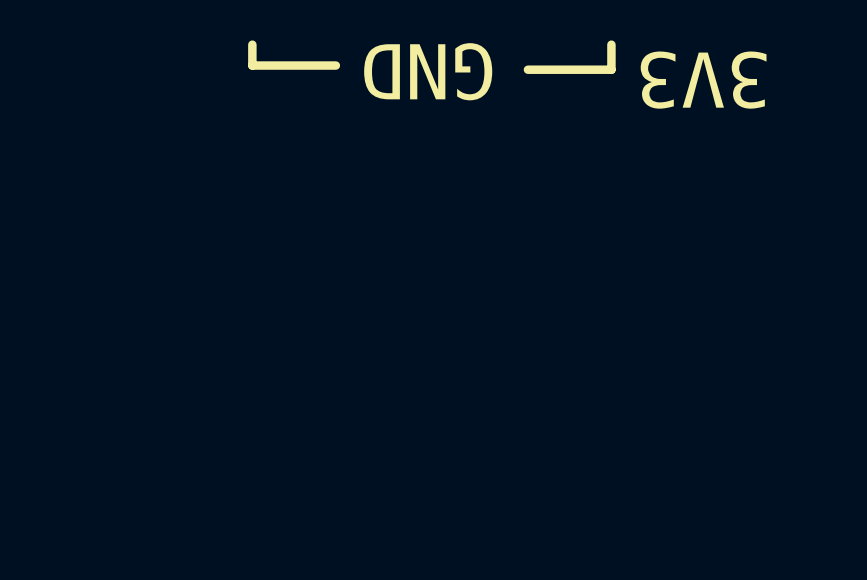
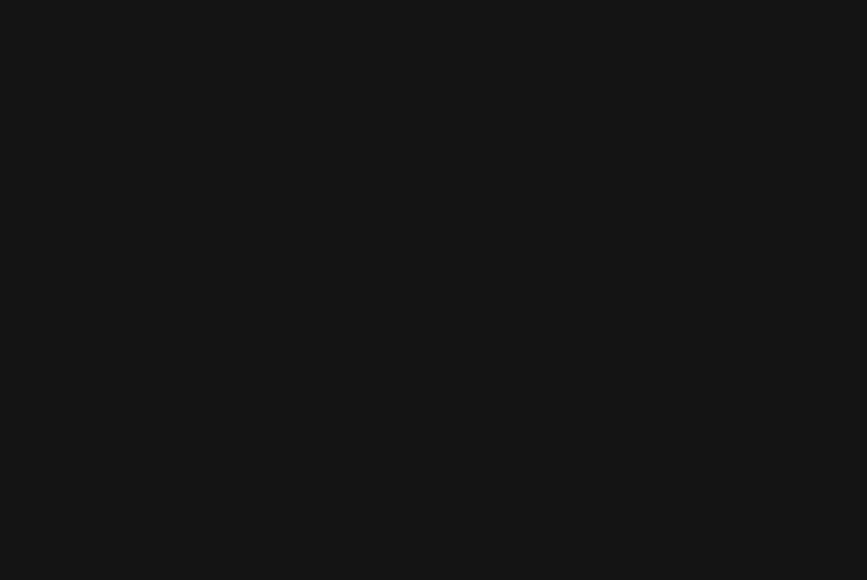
line: (252, 44) (252, 65) (335, 65) -> none
line: (611, 44) (611, 69) (527, 69) -> none
text: GND (428, 71) -> none
text: 3V3 (703, 80) -> none

